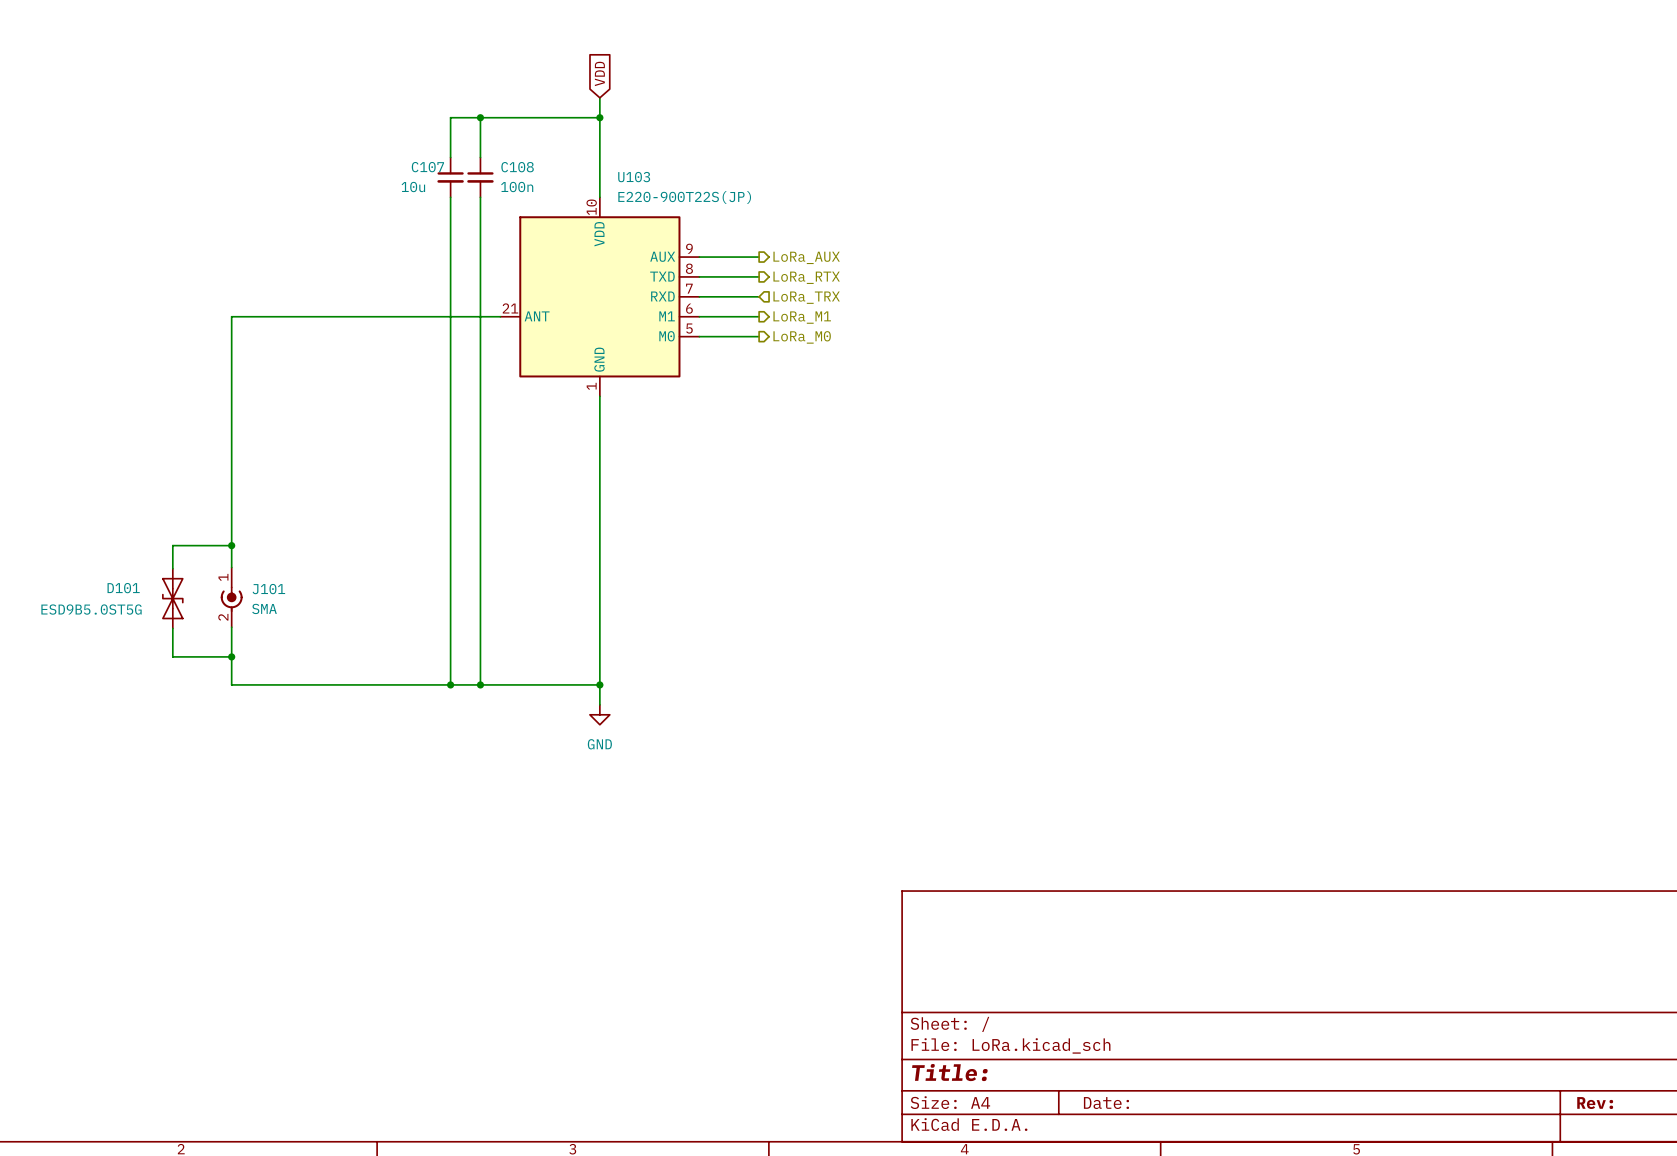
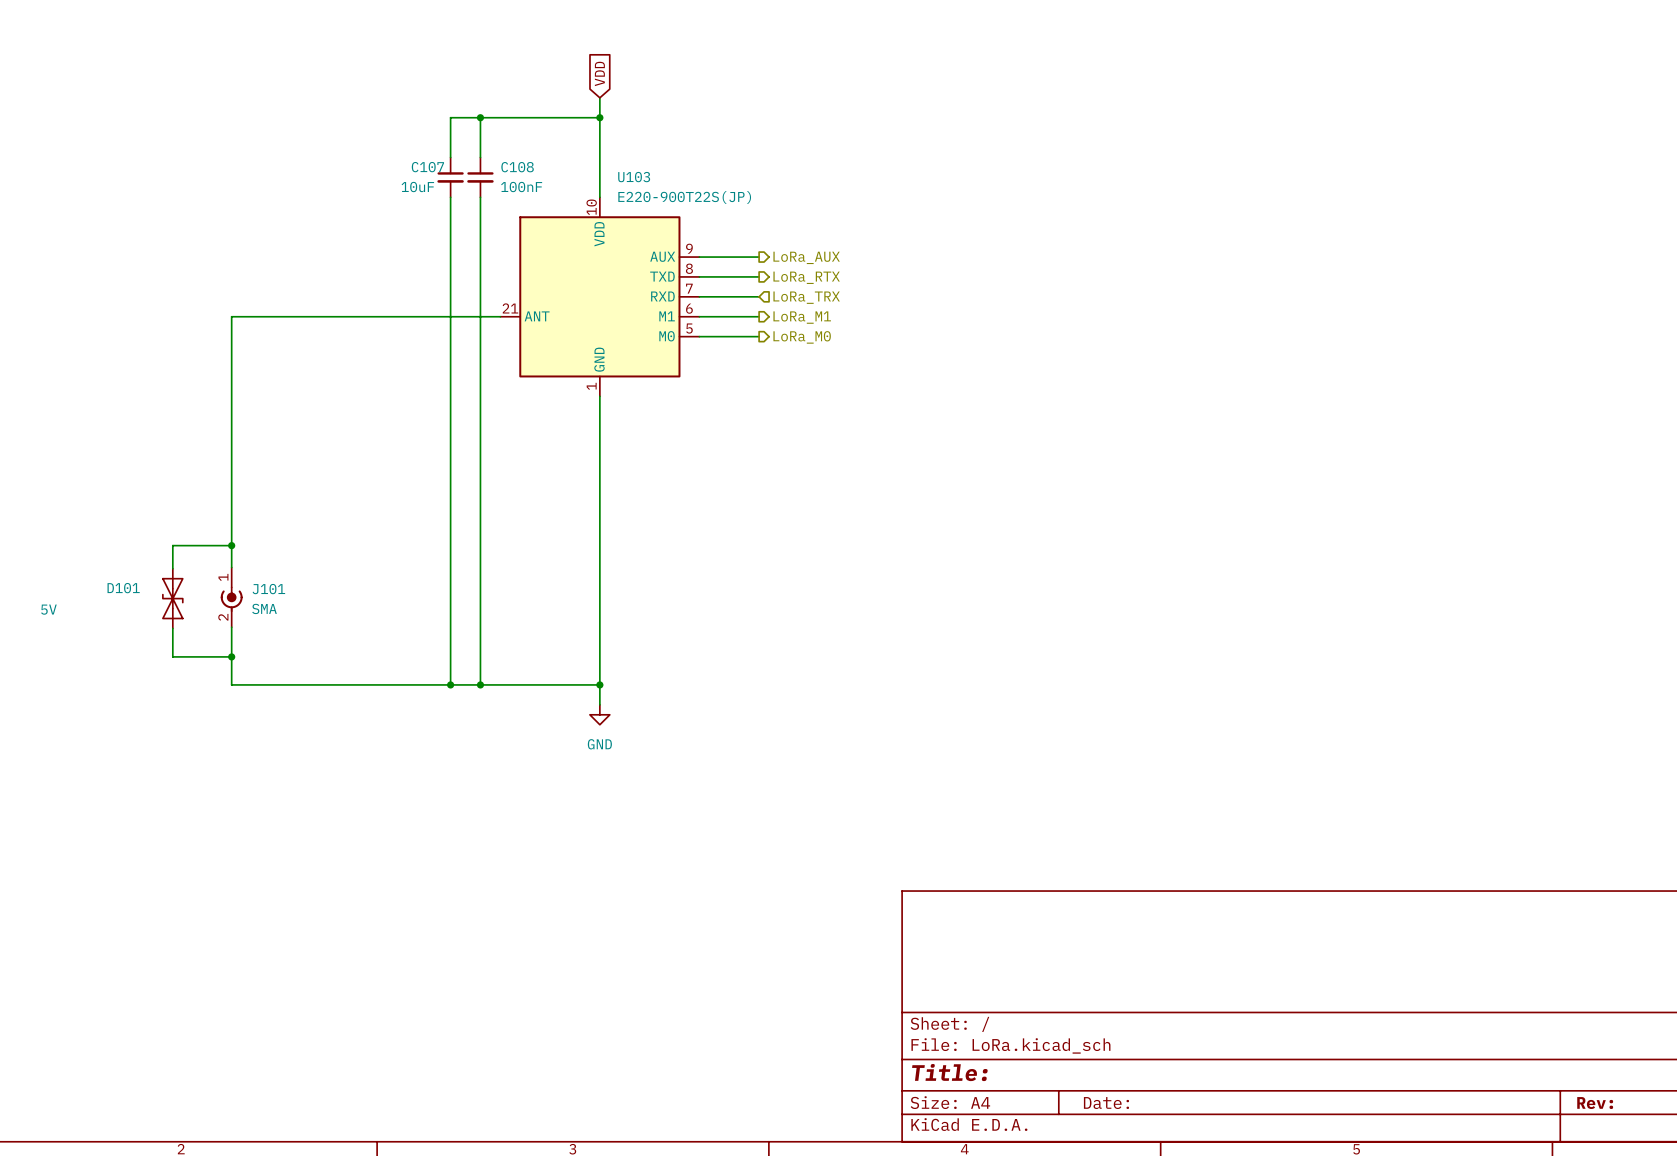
C107 value: 10u (413, 187) -> 10uF (417, 187)
C108 value: 100n (517, 187) -> 100nF (521, 187)
D101 value: ESD9B5.0ST5G (91, 609) -> 5V (48, 609)

